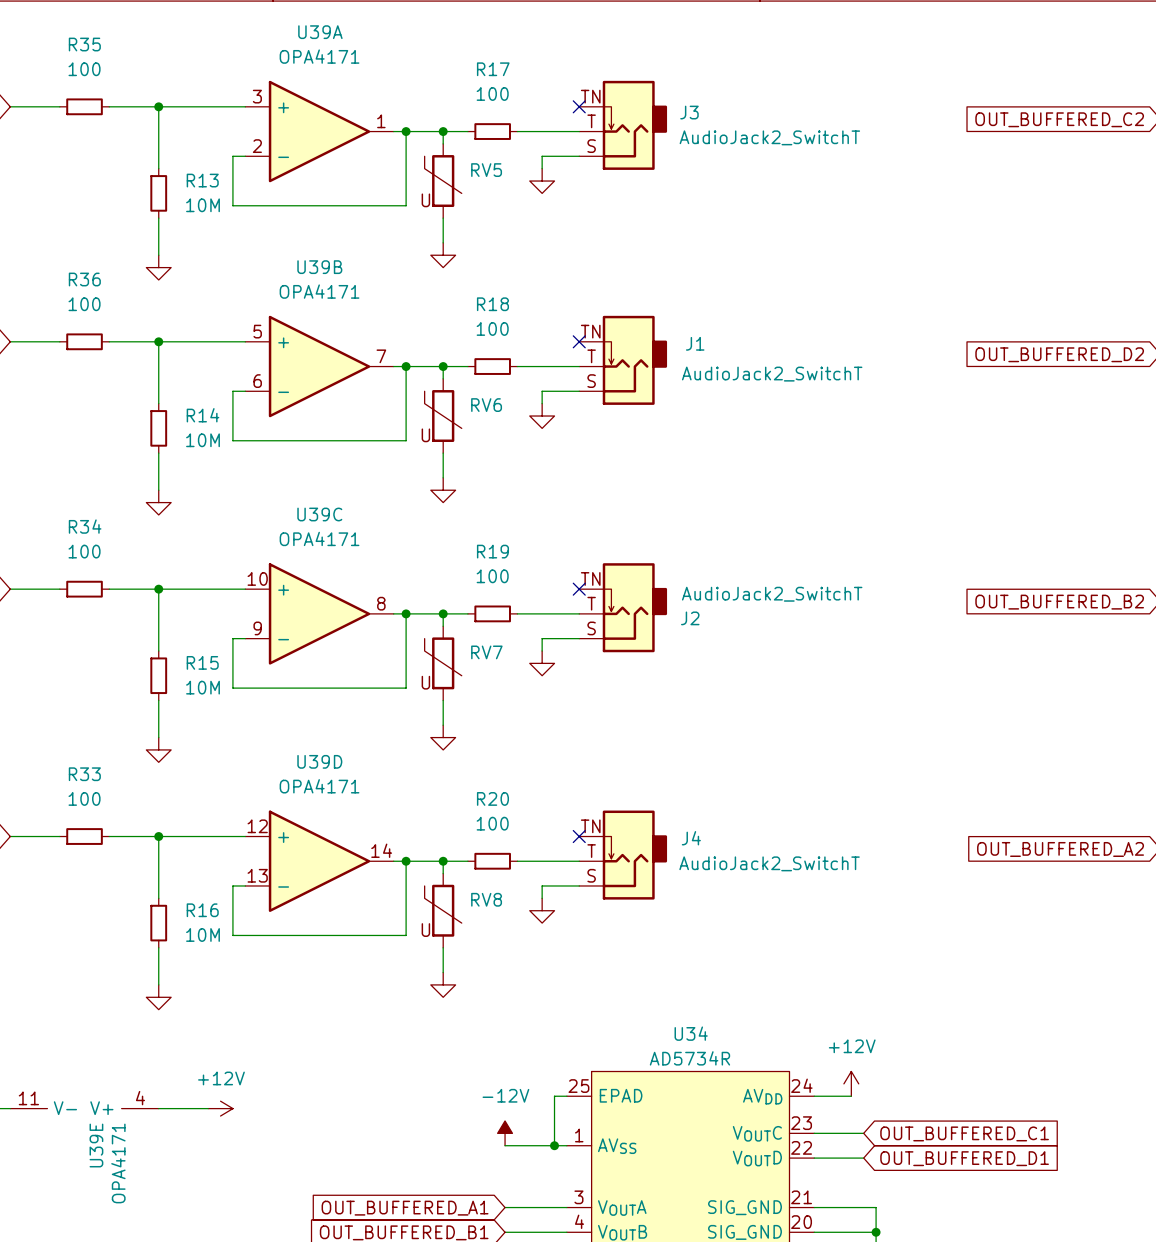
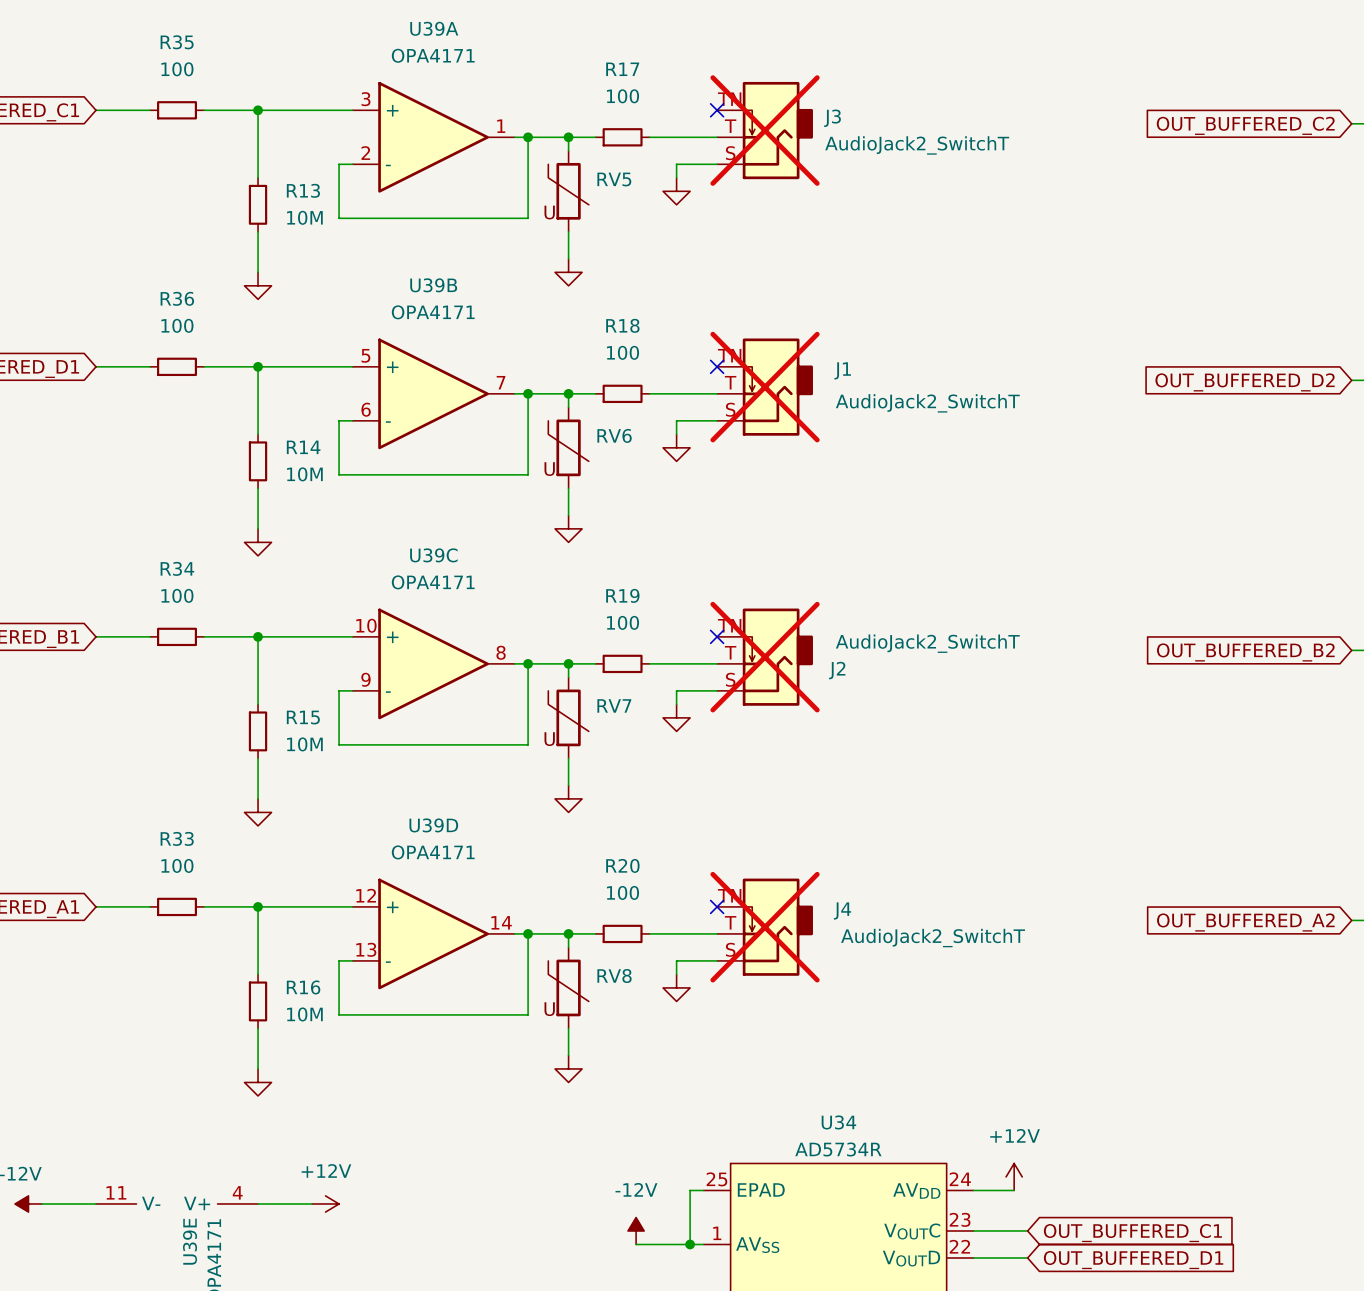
J3 do-not-place cross: none -> (765, 130)
J1 do-not-place cross: none -> (765, 387)
J2 do-not-place cross: none -> (765, 657)
J4 do-not-place cross: none -> (765, 927)

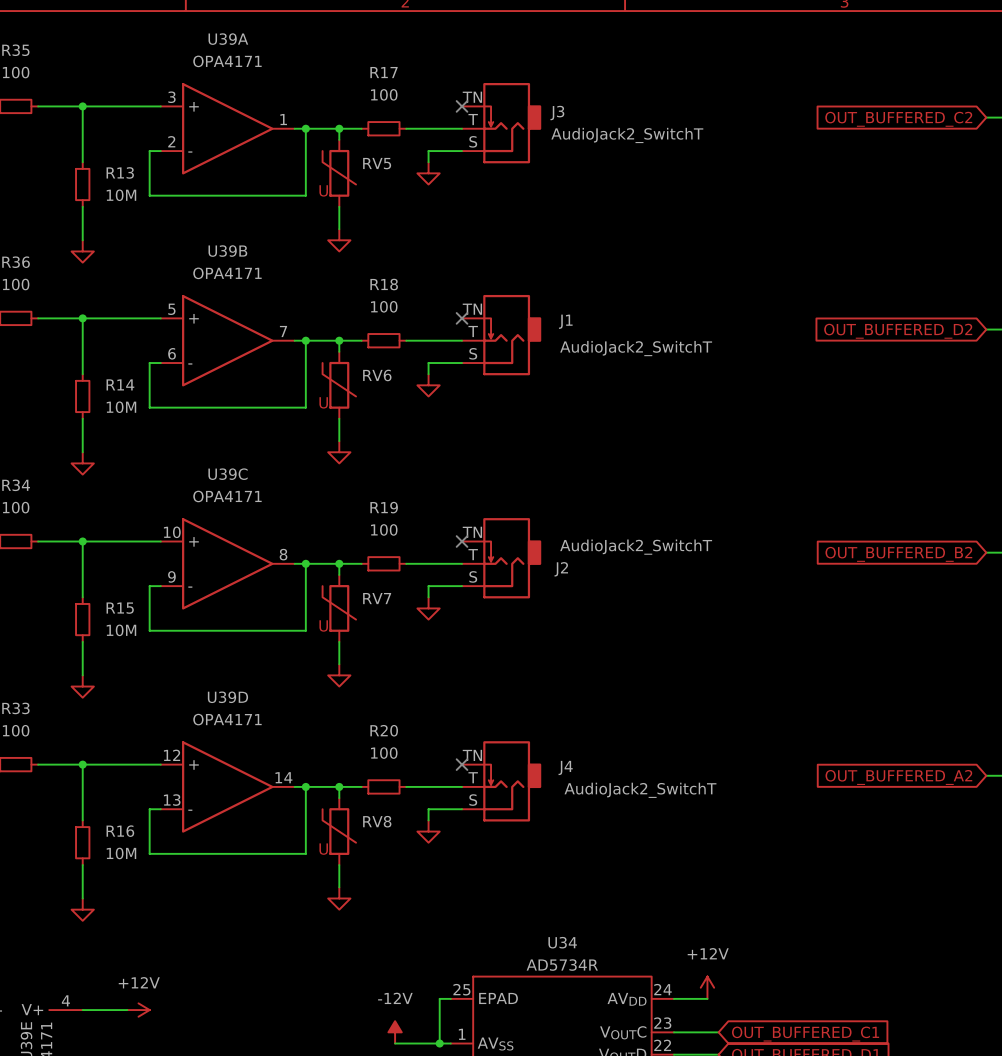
J3 do-not-place cross: (765, 130) -> none
J1 do-not-place cross: (765, 387) -> none
J2 do-not-place cross: (765, 657) -> none
J4 do-not-place cross: (765, 927) -> none

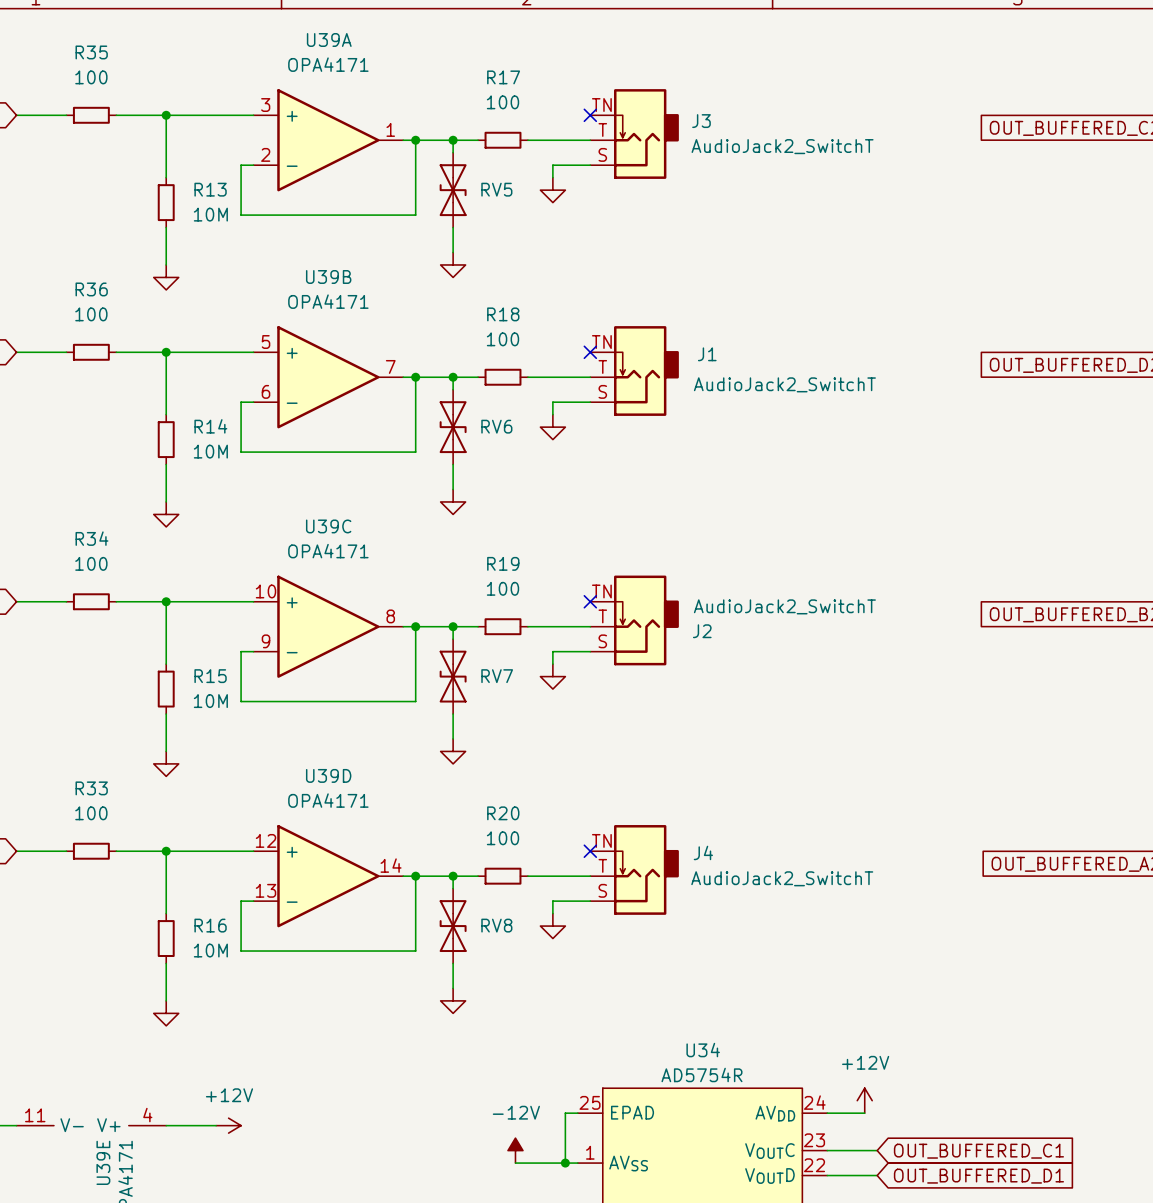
RV5 symbol: [322, 139, 357, 207] -> [439, 152, 467, 228]
RV6 symbol: [322, 351, 357, 419] -> [439, 389, 467, 465]
RV7 symbol: [322, 574, 357, 642] -> [439, 639, 467, 715]
RV8 symbol: [322, 798, 357, 866] -> [439, 888, 467, 964]
U34 value: AD5734R (562, 965) -> AD5754R (701, 1074)

